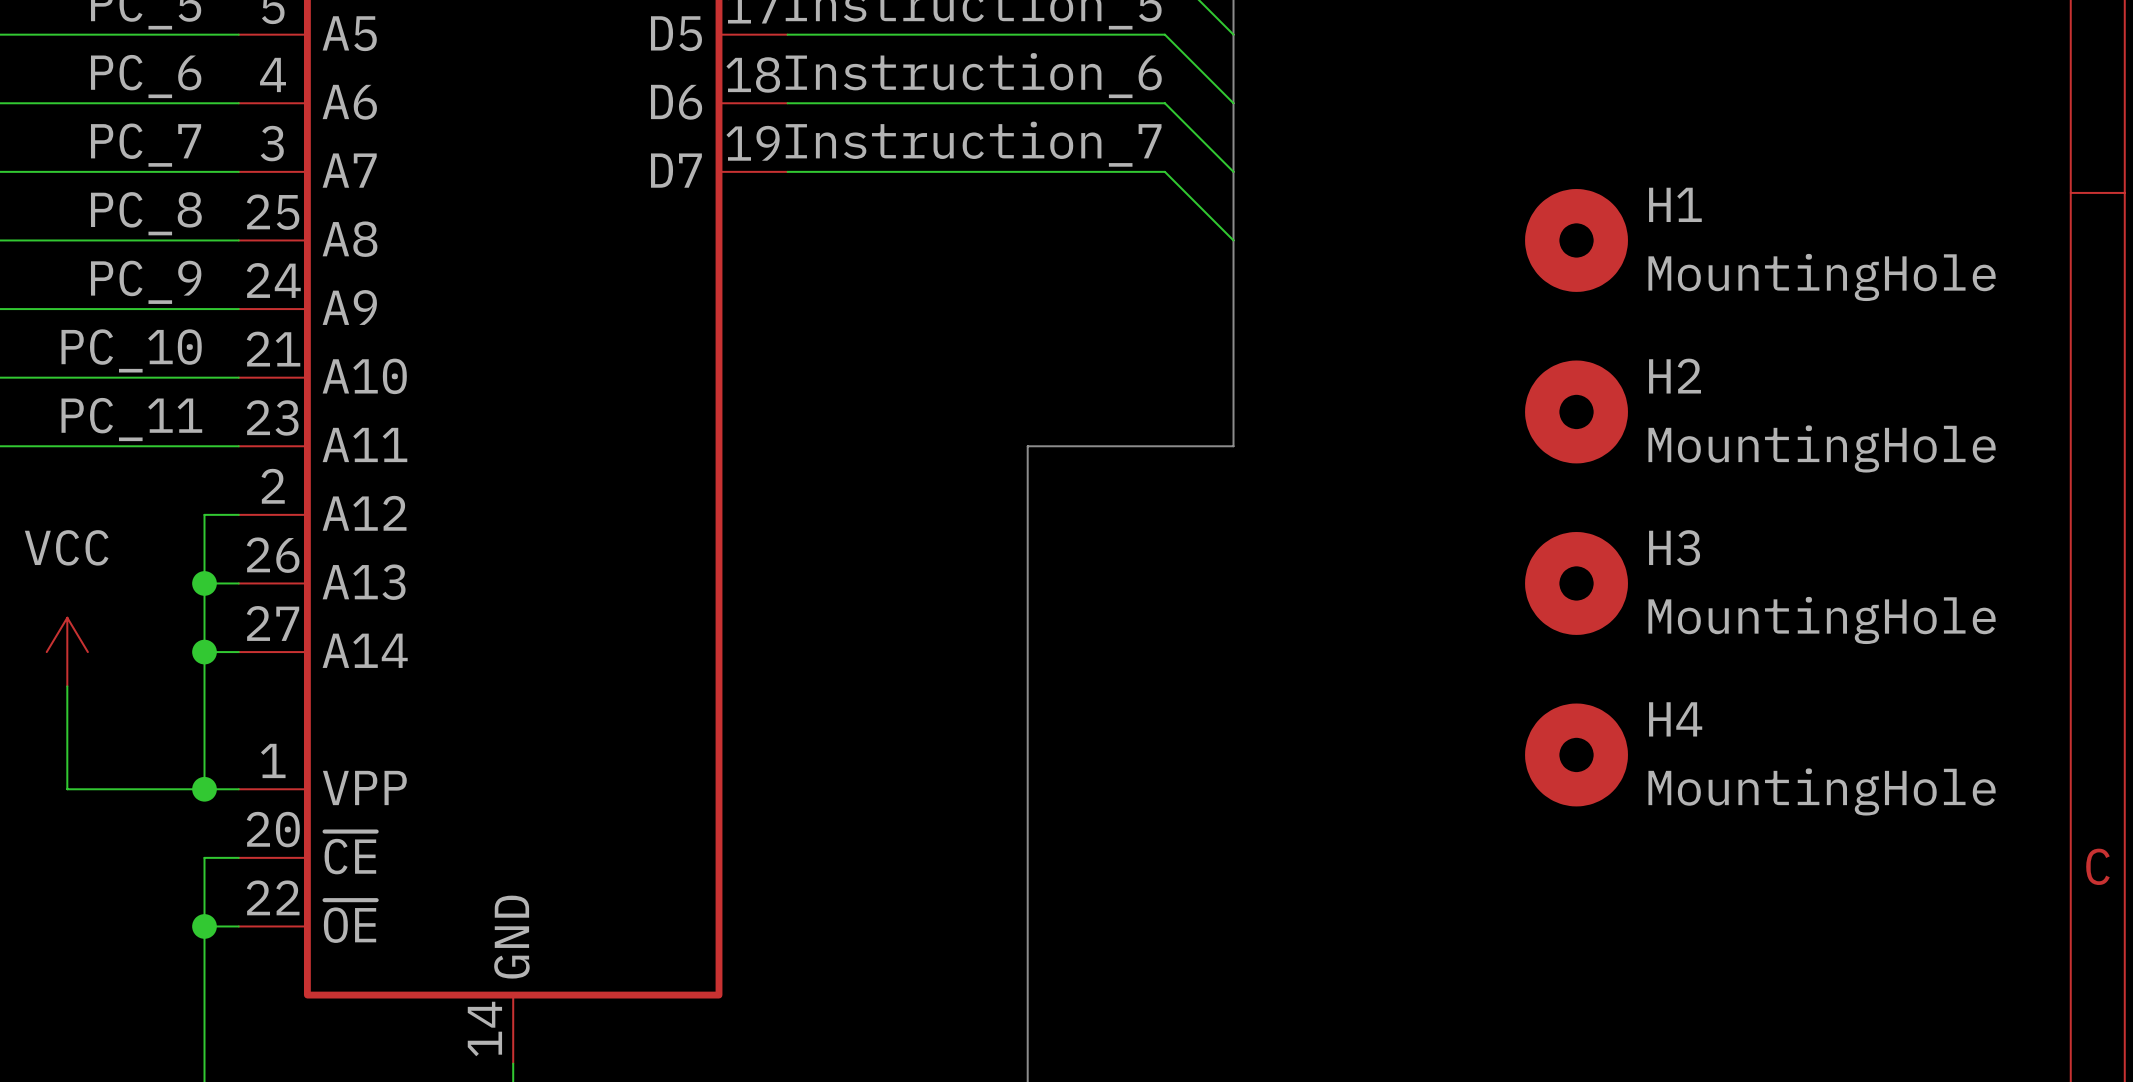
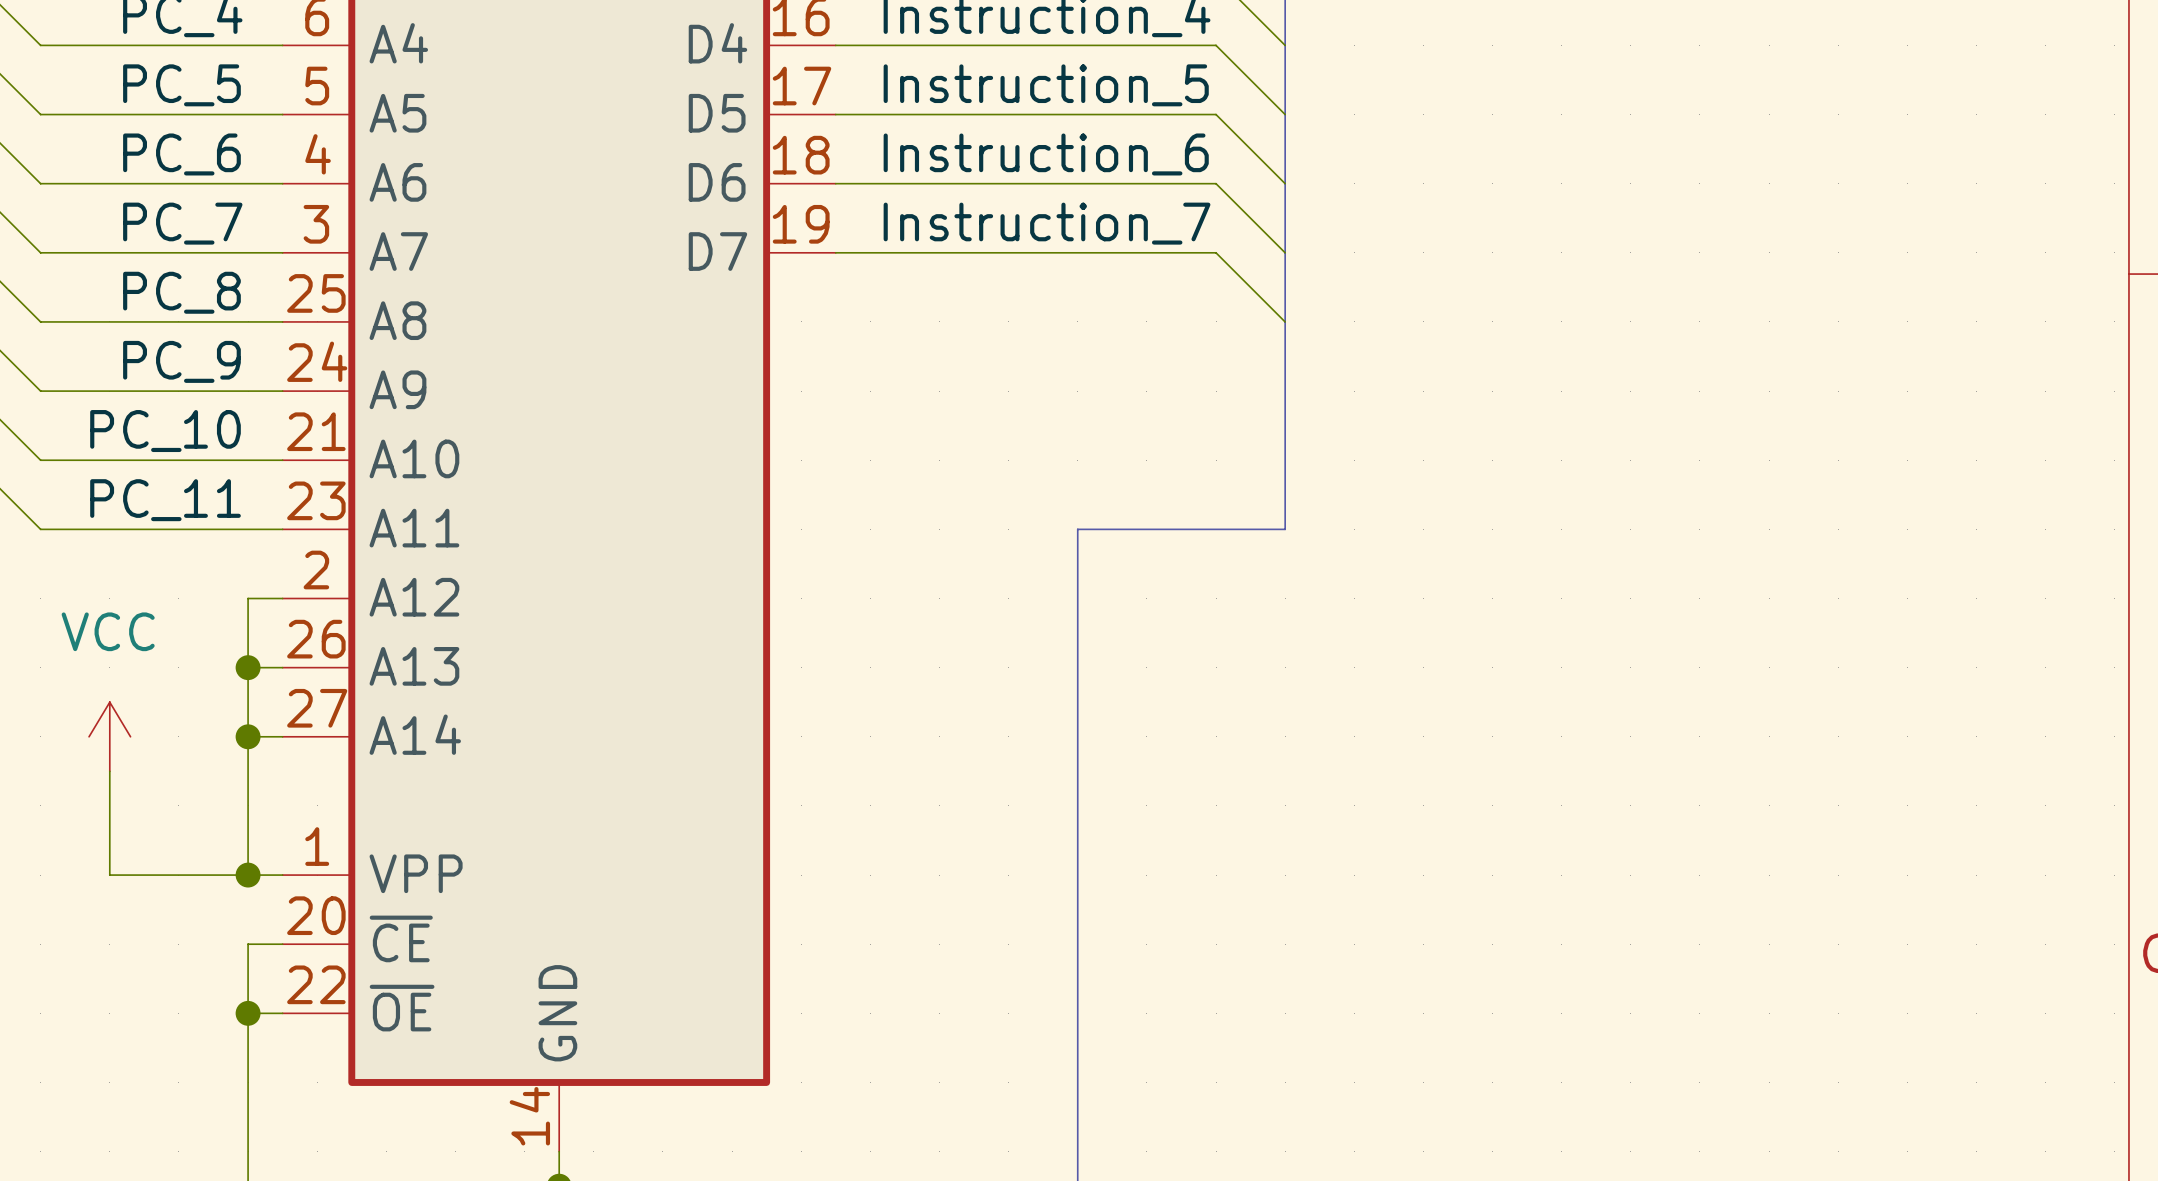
H1: MountingHole (1576, 240) -> none
H2: MountingHole (1576, 411) -> none
H3: MountingHole (1576, 583) -> none
H4: MountingHole (1576, 754) -> none

